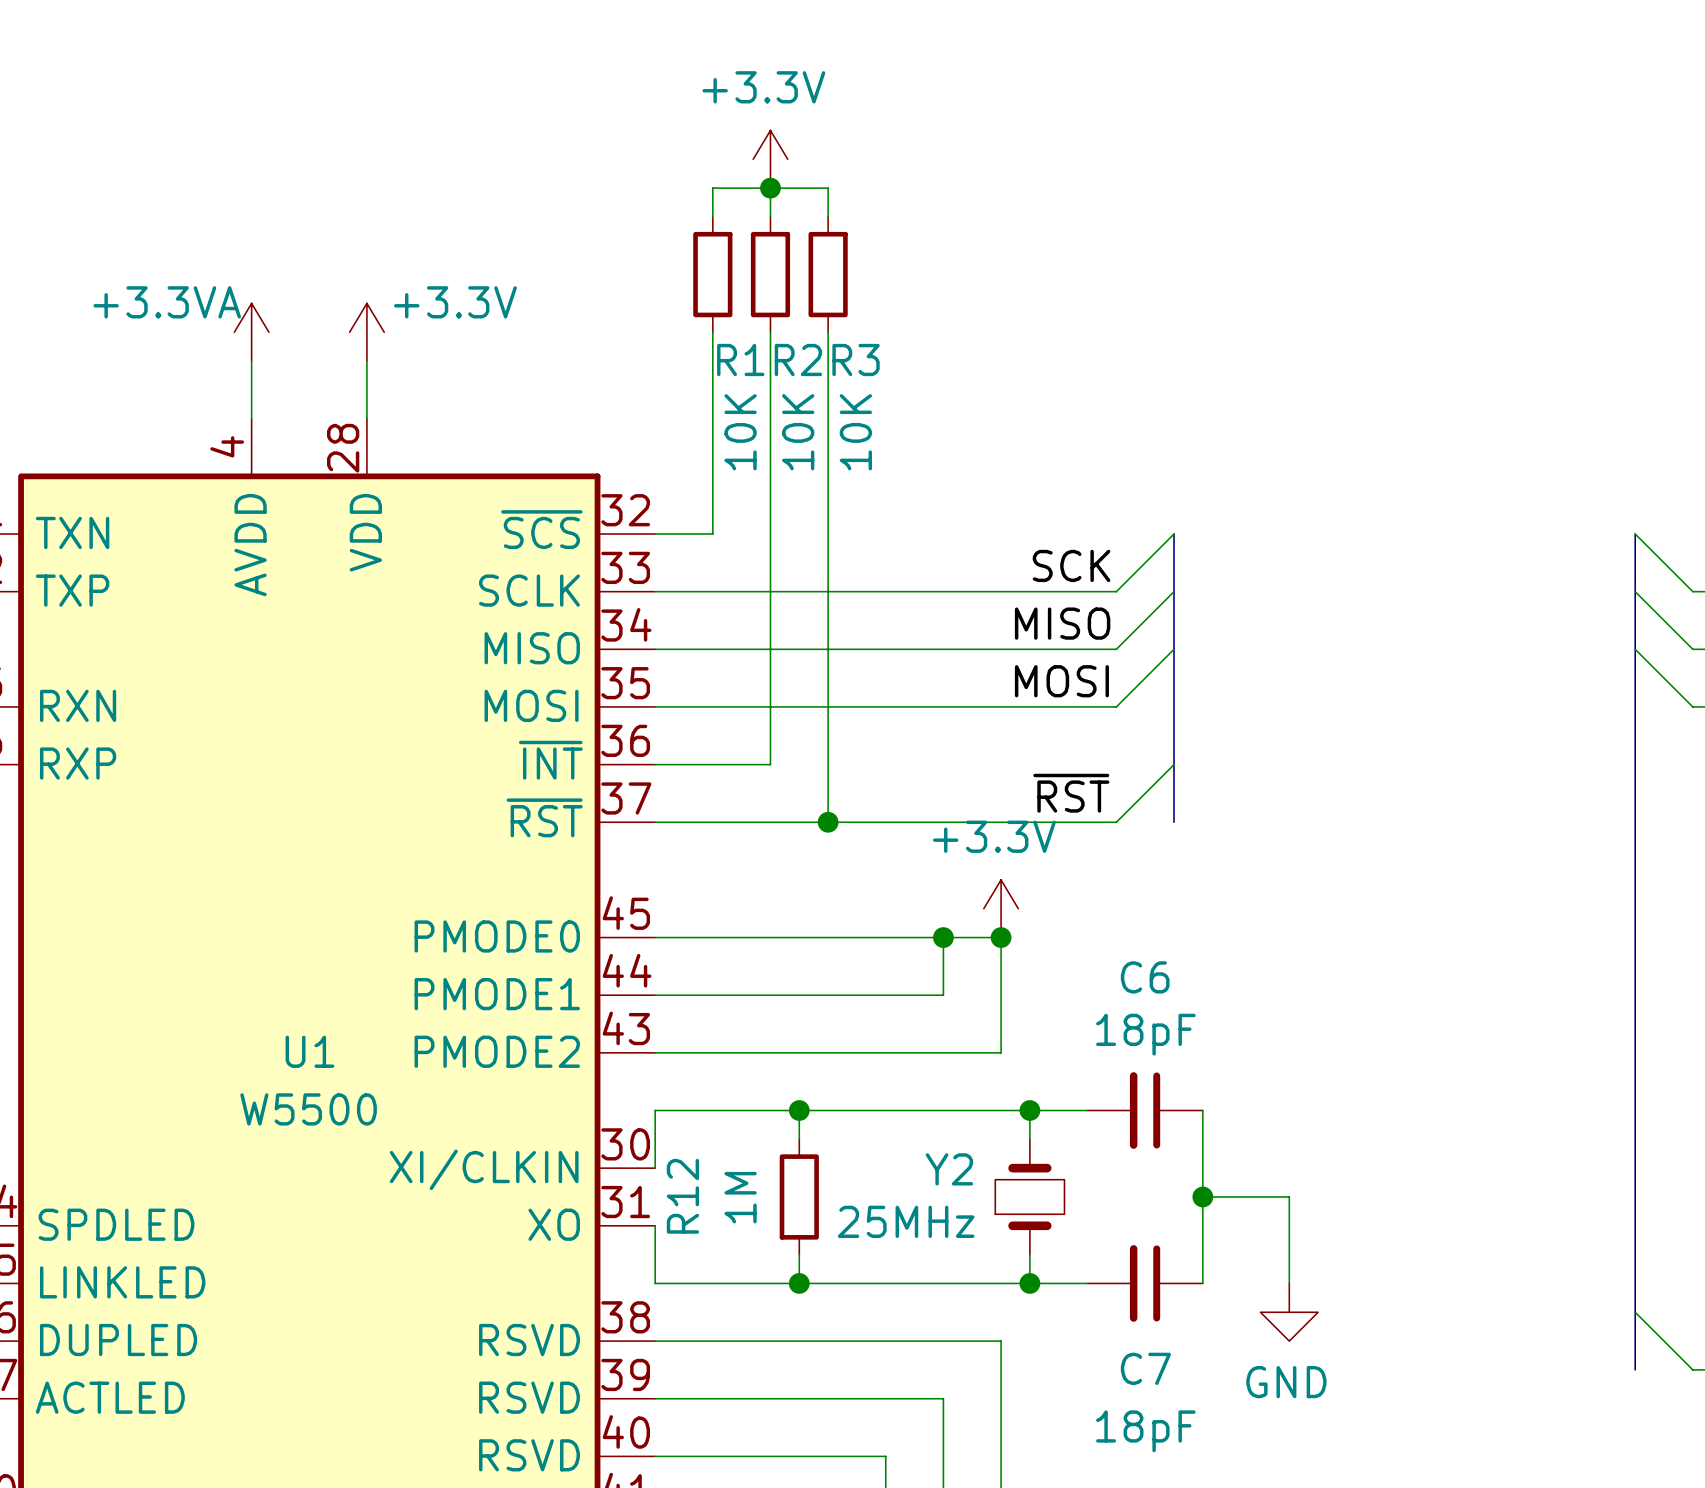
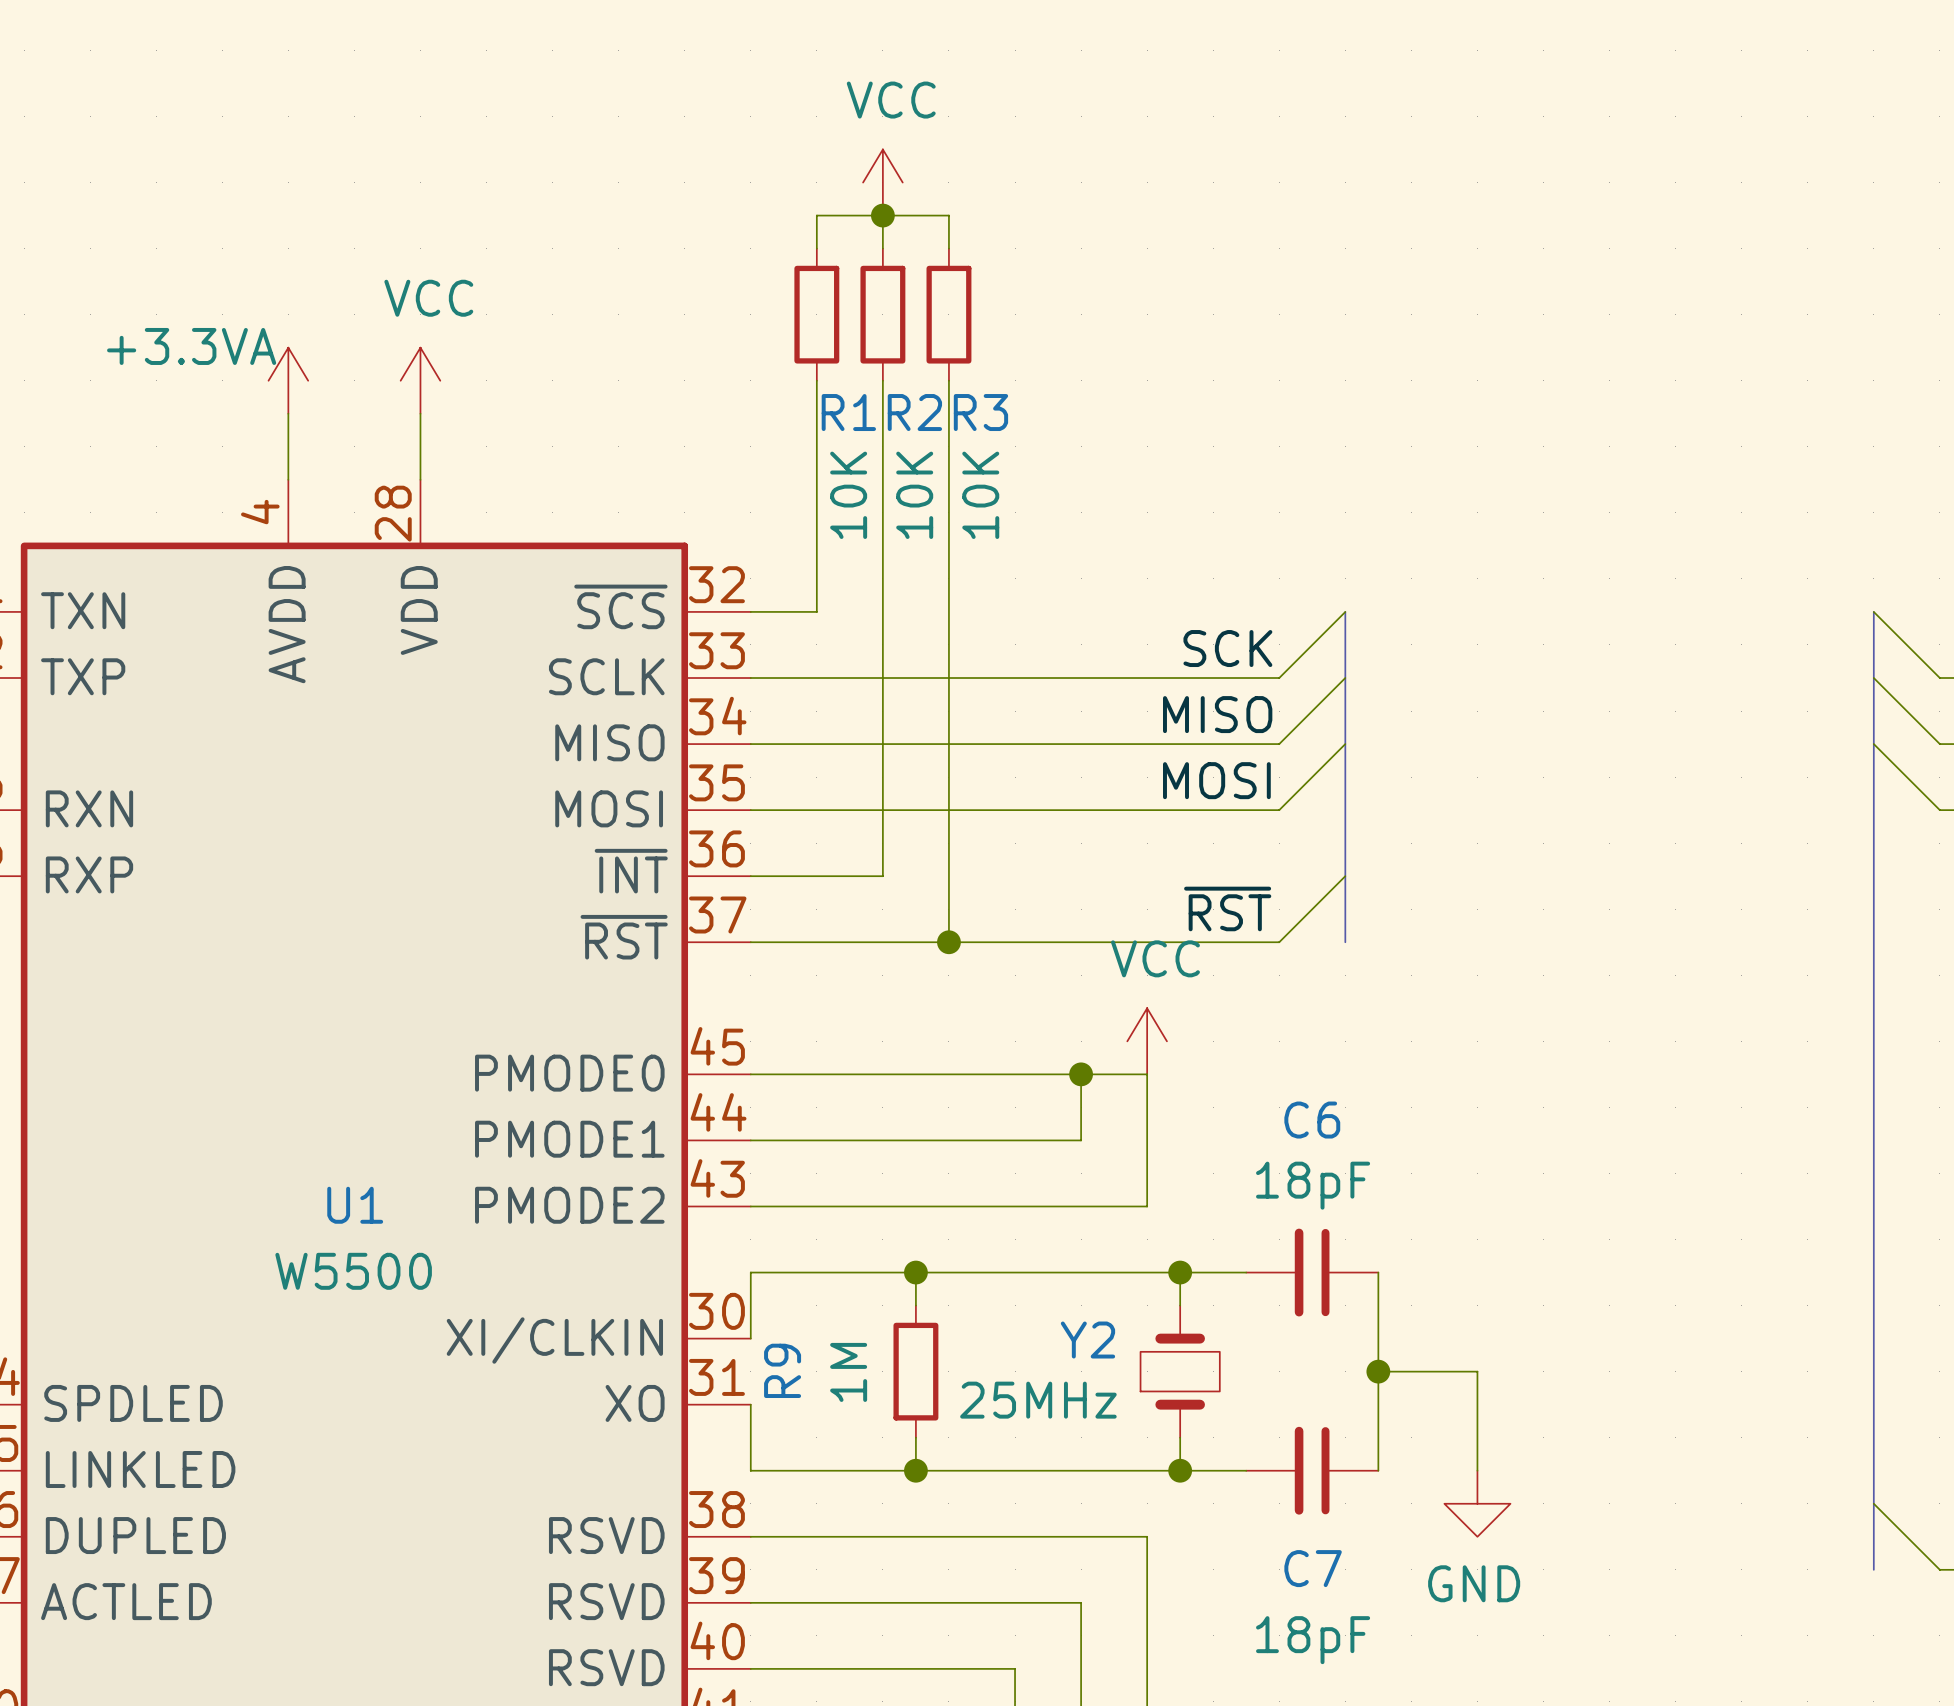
power symbol: +3.3V (770, 159) -> VCC (882, 182)
power symbol: +3.3V (366, 332) -> VCC (420, 380)
power symbol: +3.3V (1001, 908) -> VCC (1147, 1041)
junction: (1001, 937) -> none
R12 name: R12 (682, 1196) -> R9 (782, 1370)

